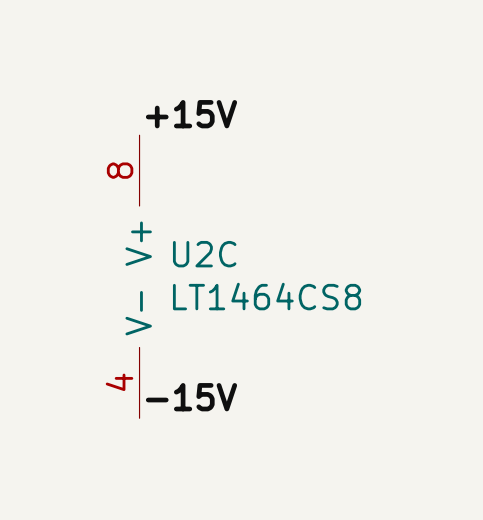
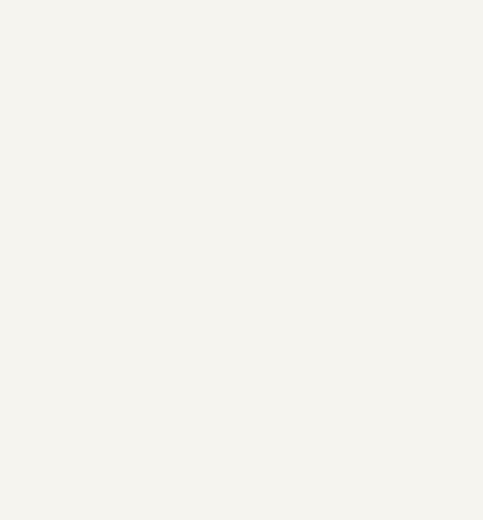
label: +15V (191, 114) -> none
U2C: LT1464CS8 (139, 276) -> none
label: -15V (191, 397) -> none

